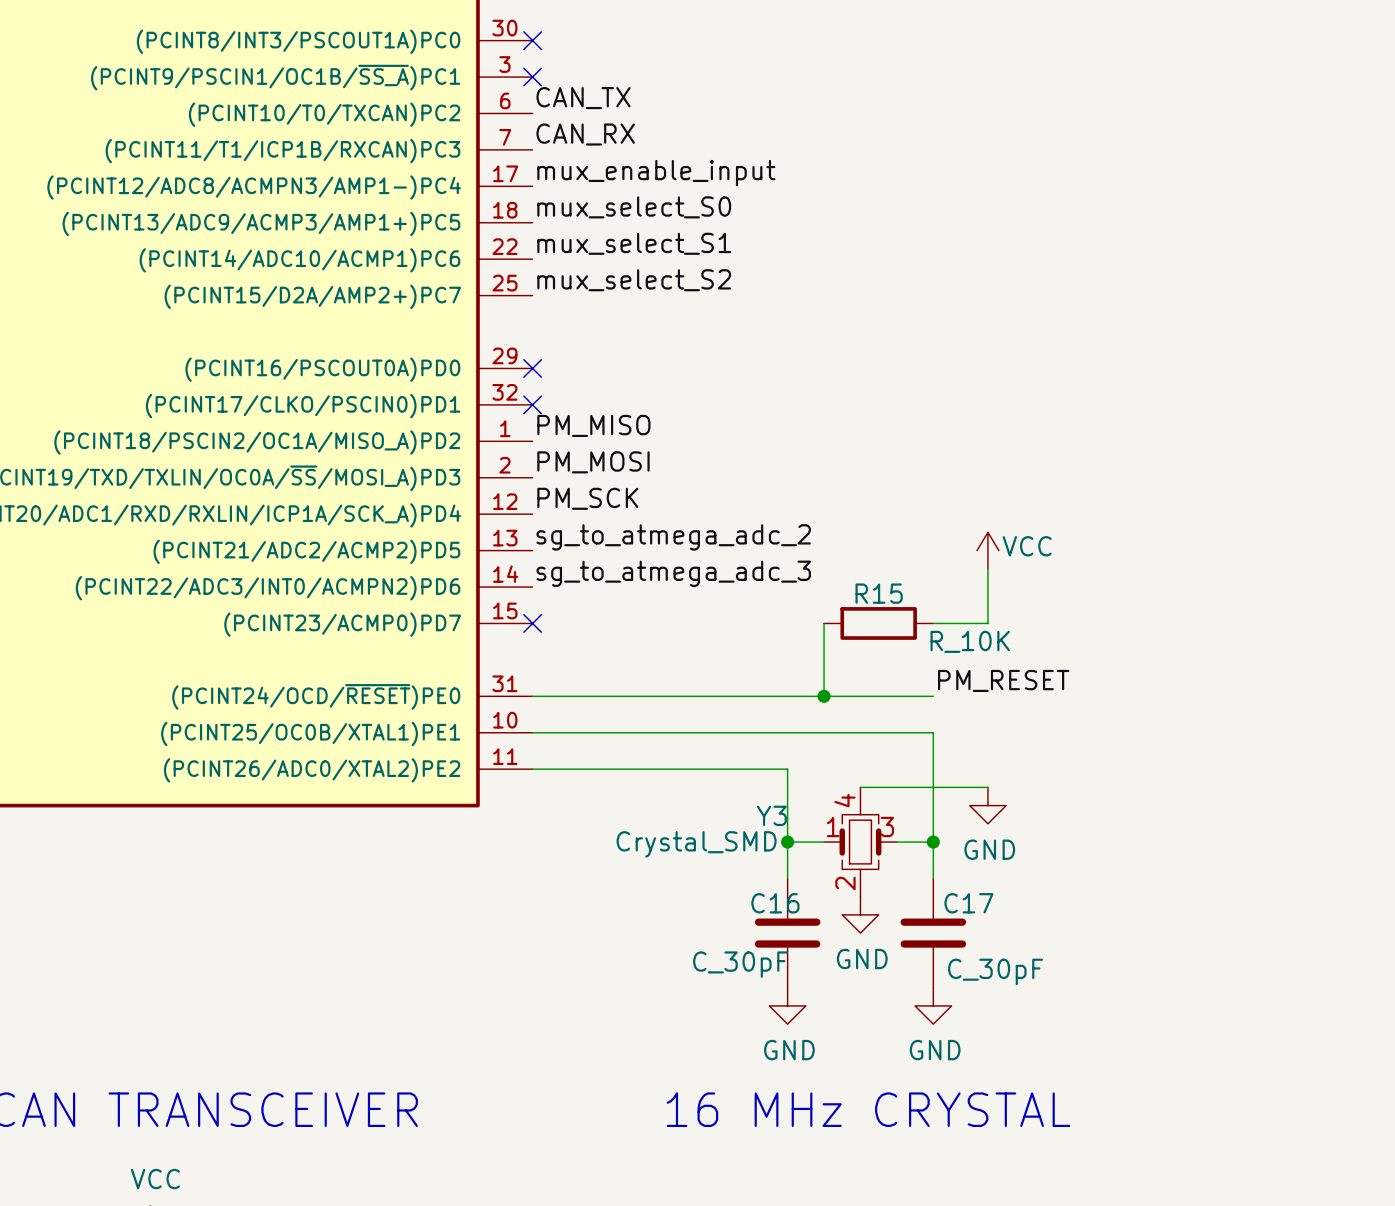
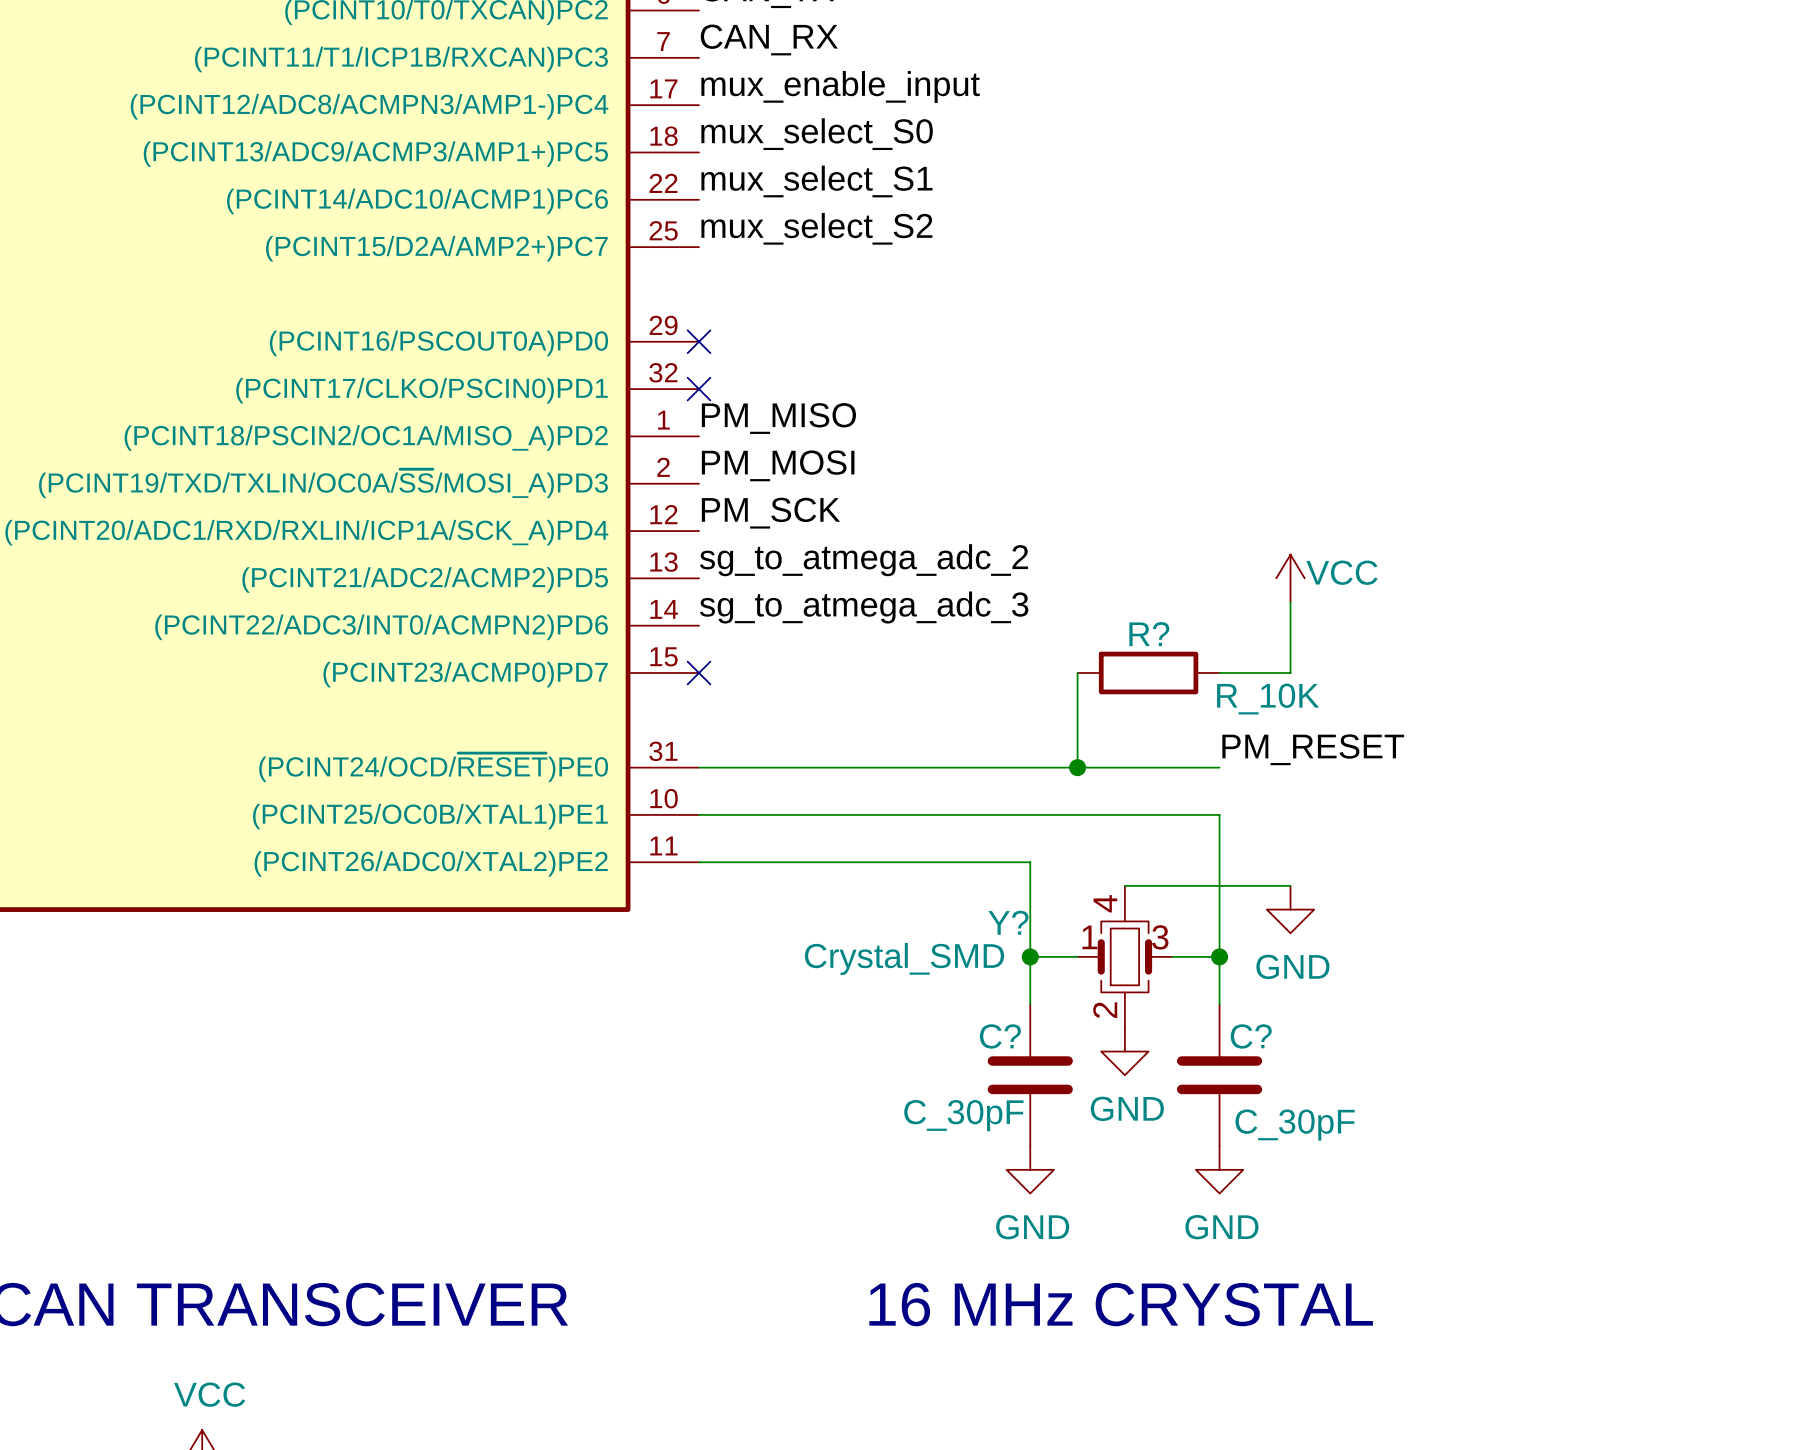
R15 name: R15 (879, 593) -> R? (1149, 634)
Y3 name: Y3 (771, 815) -> Y? (1008, 922)
C16 name: C16 (775, 903) -> C? (1000, 1036)
C17 name: C17 (968, 903) -> C? (1251, 1036)

